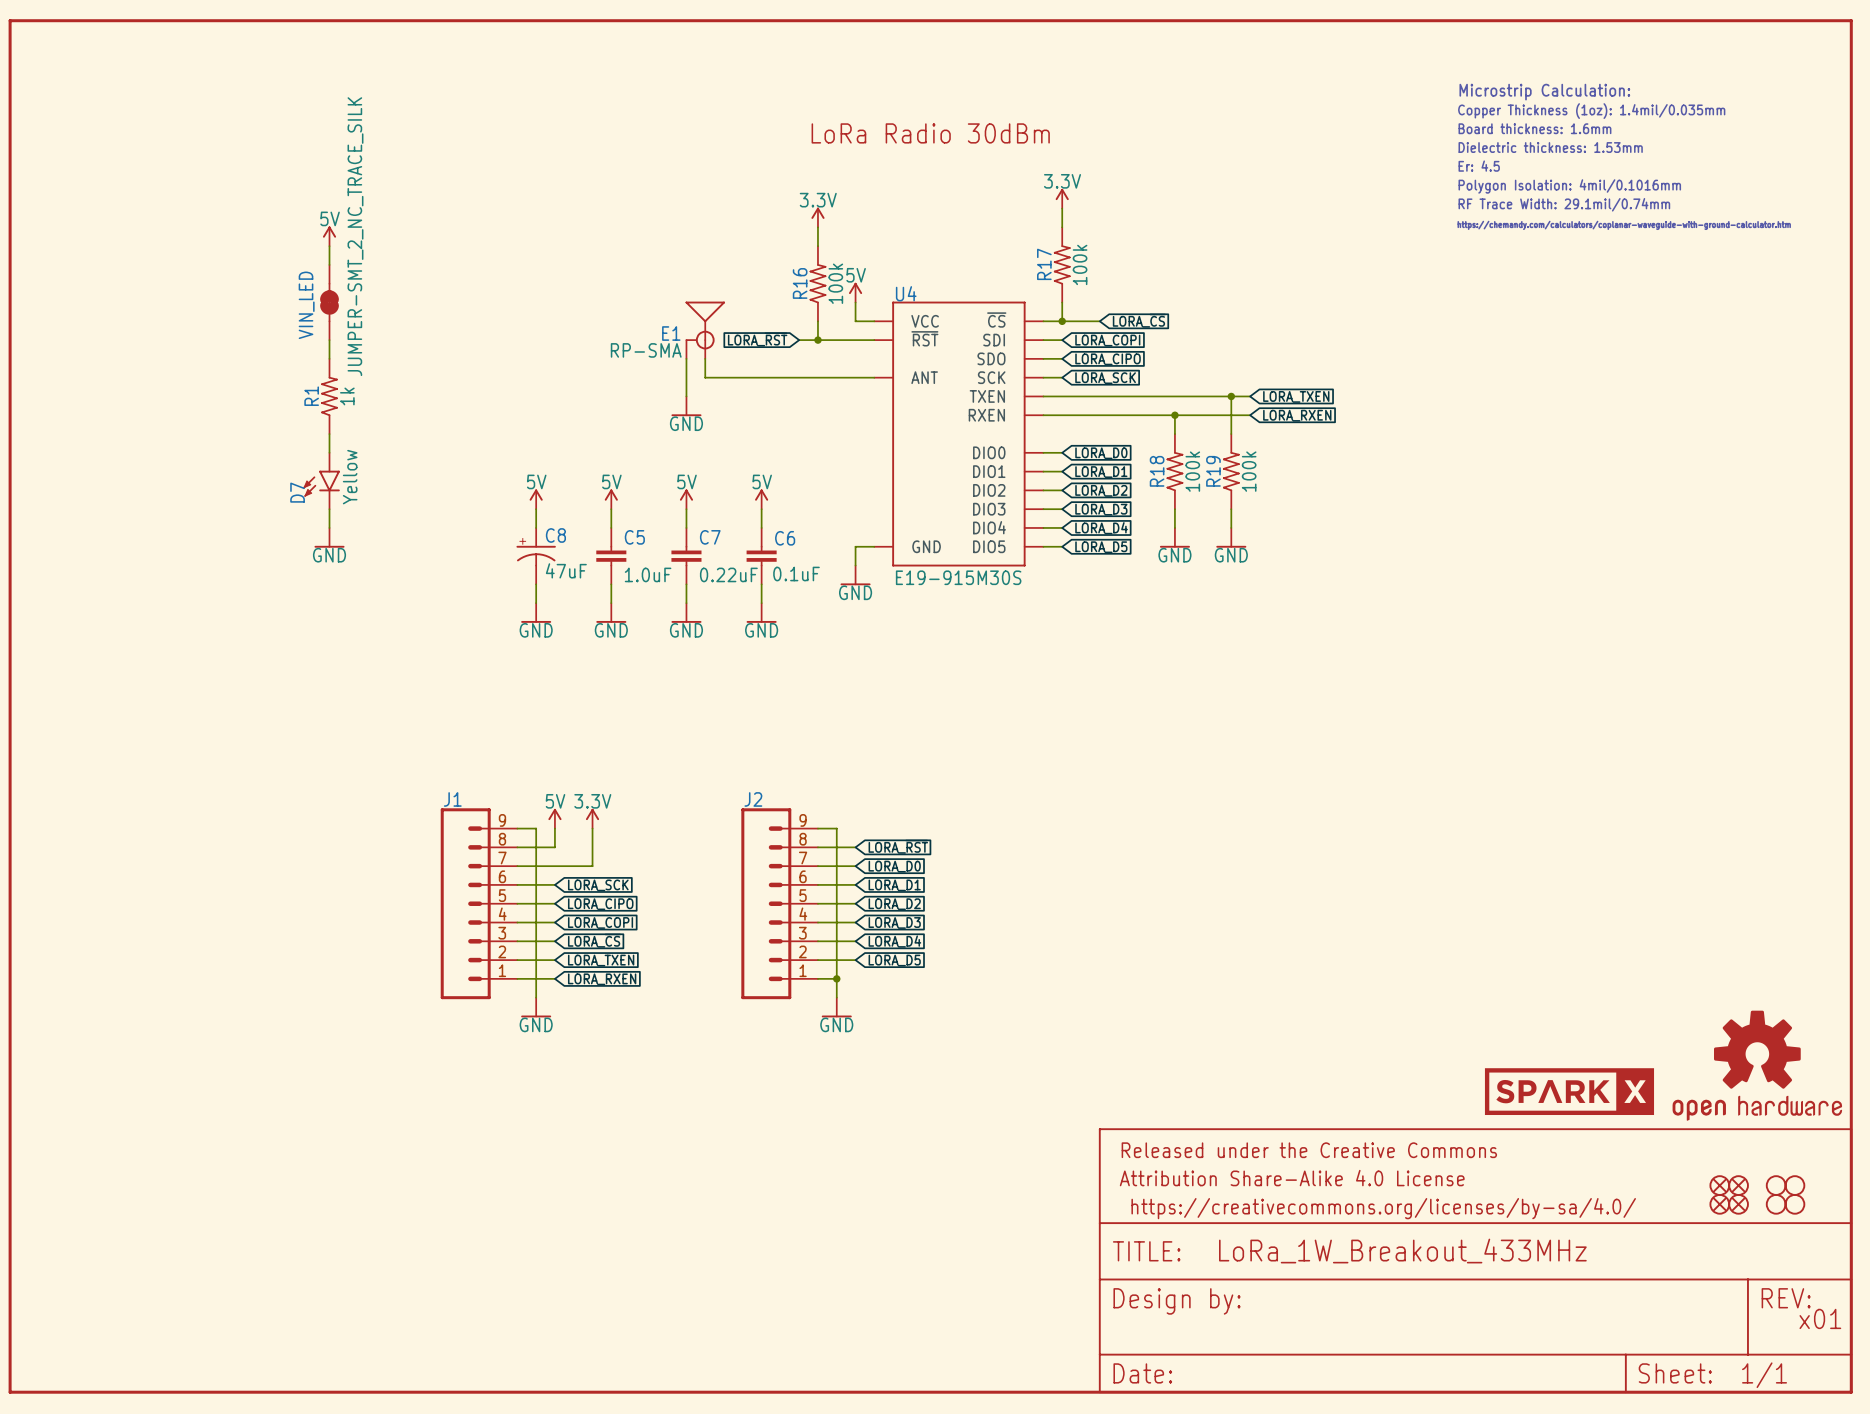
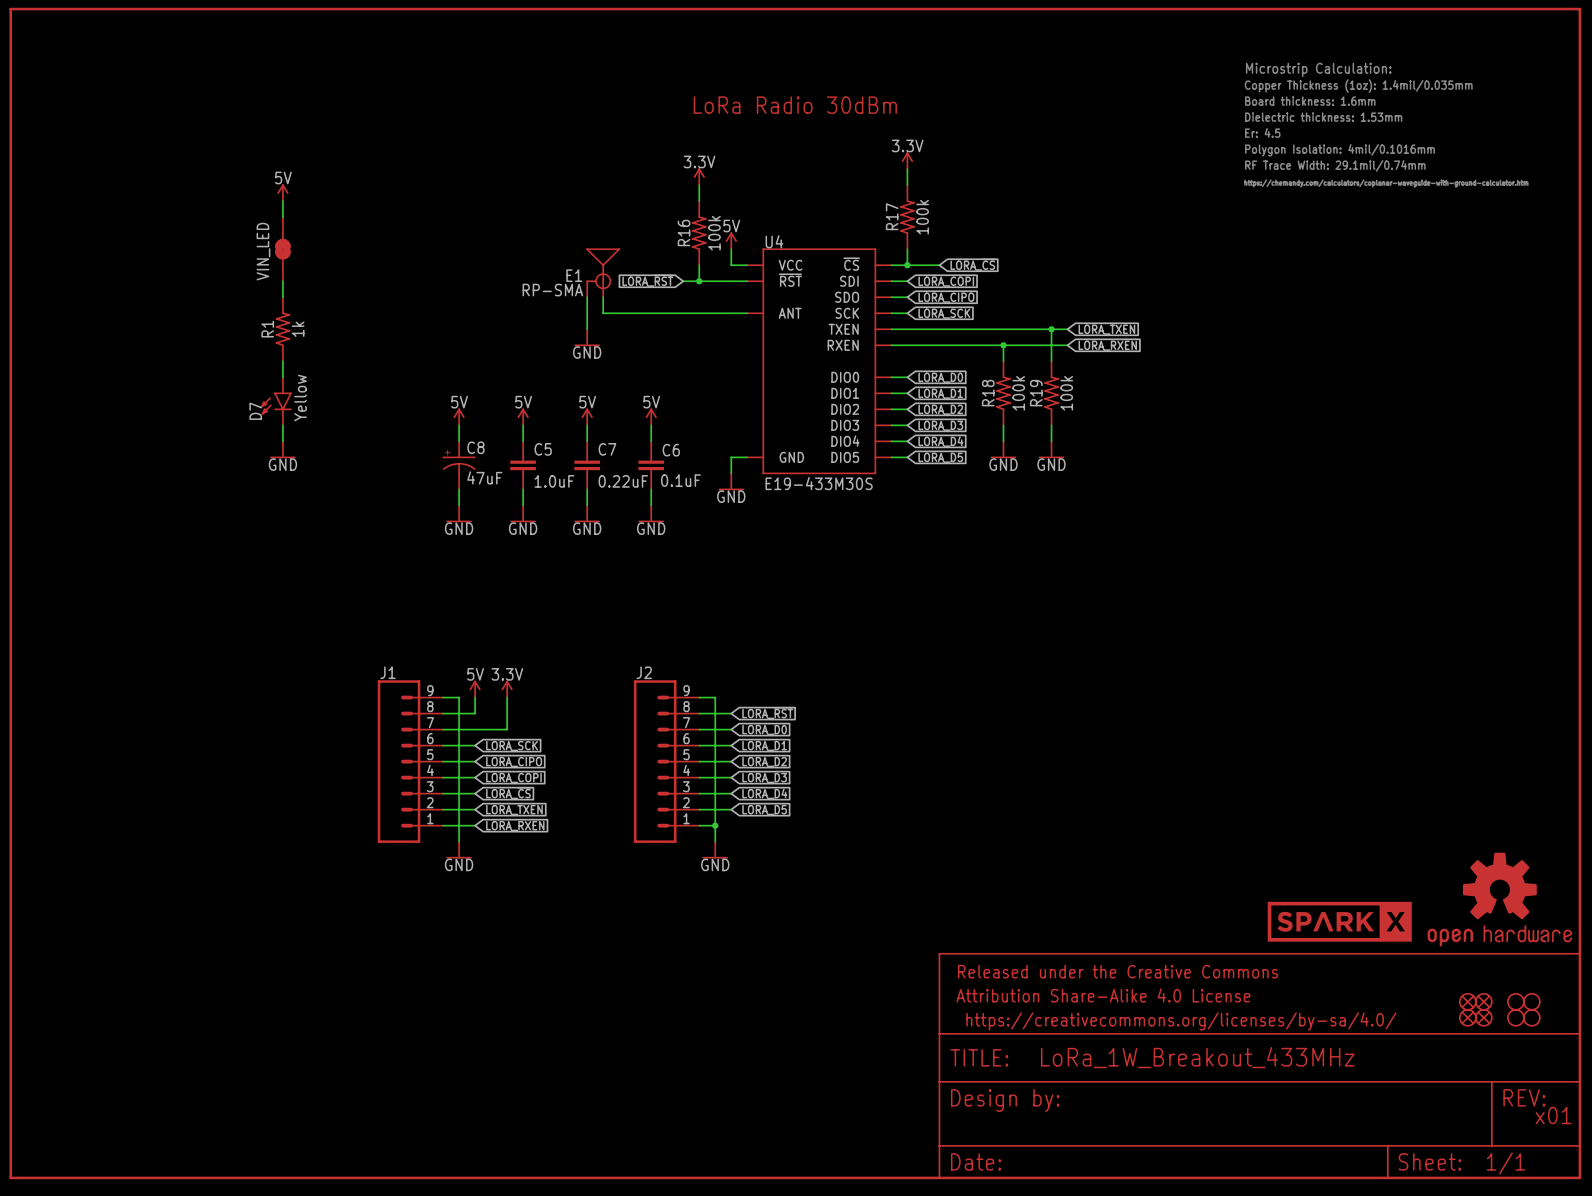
VIN_LED value: JUMPER-SMT_2_NC_TRACE_SILK (355, 236) -> none
U4 value: E19-915M30S (958, 577) -> E19-433M30S (819, 483)

